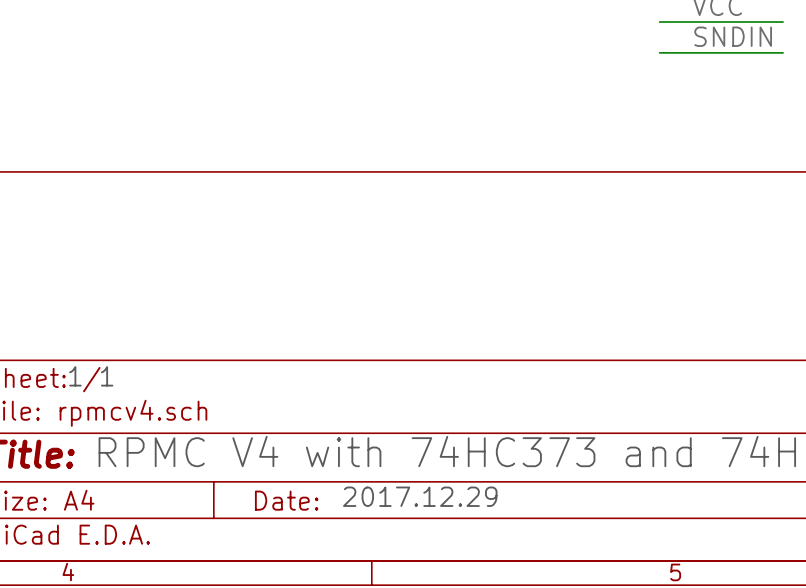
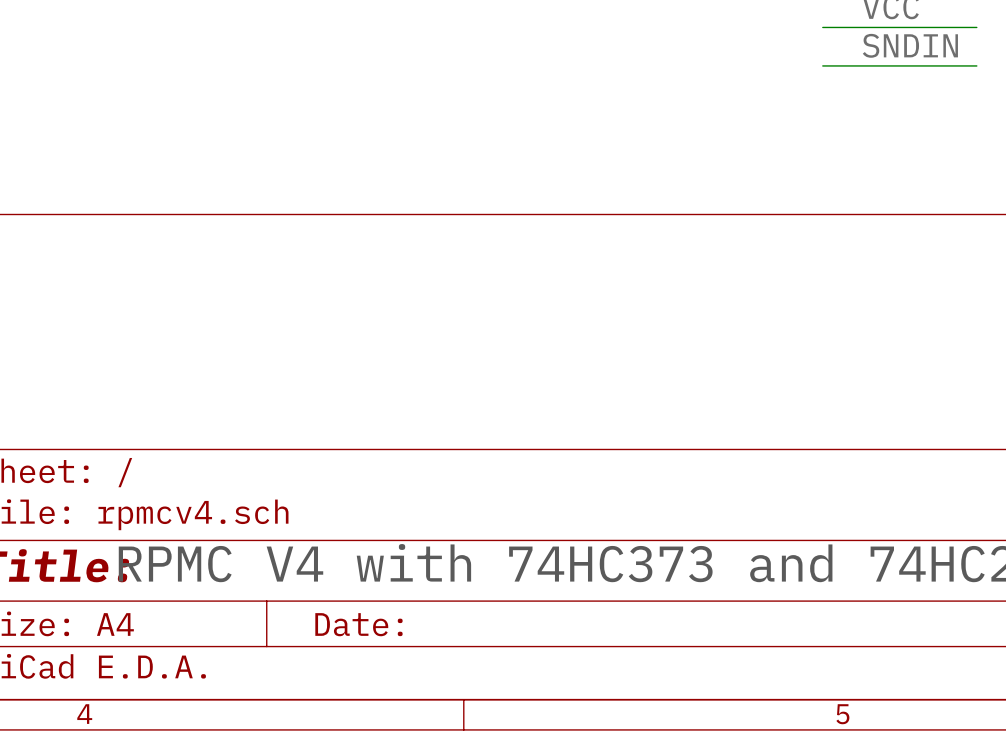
text: 1 1 (91, 376) -> none
text: 2017.12.29 (420, 496) -> none

